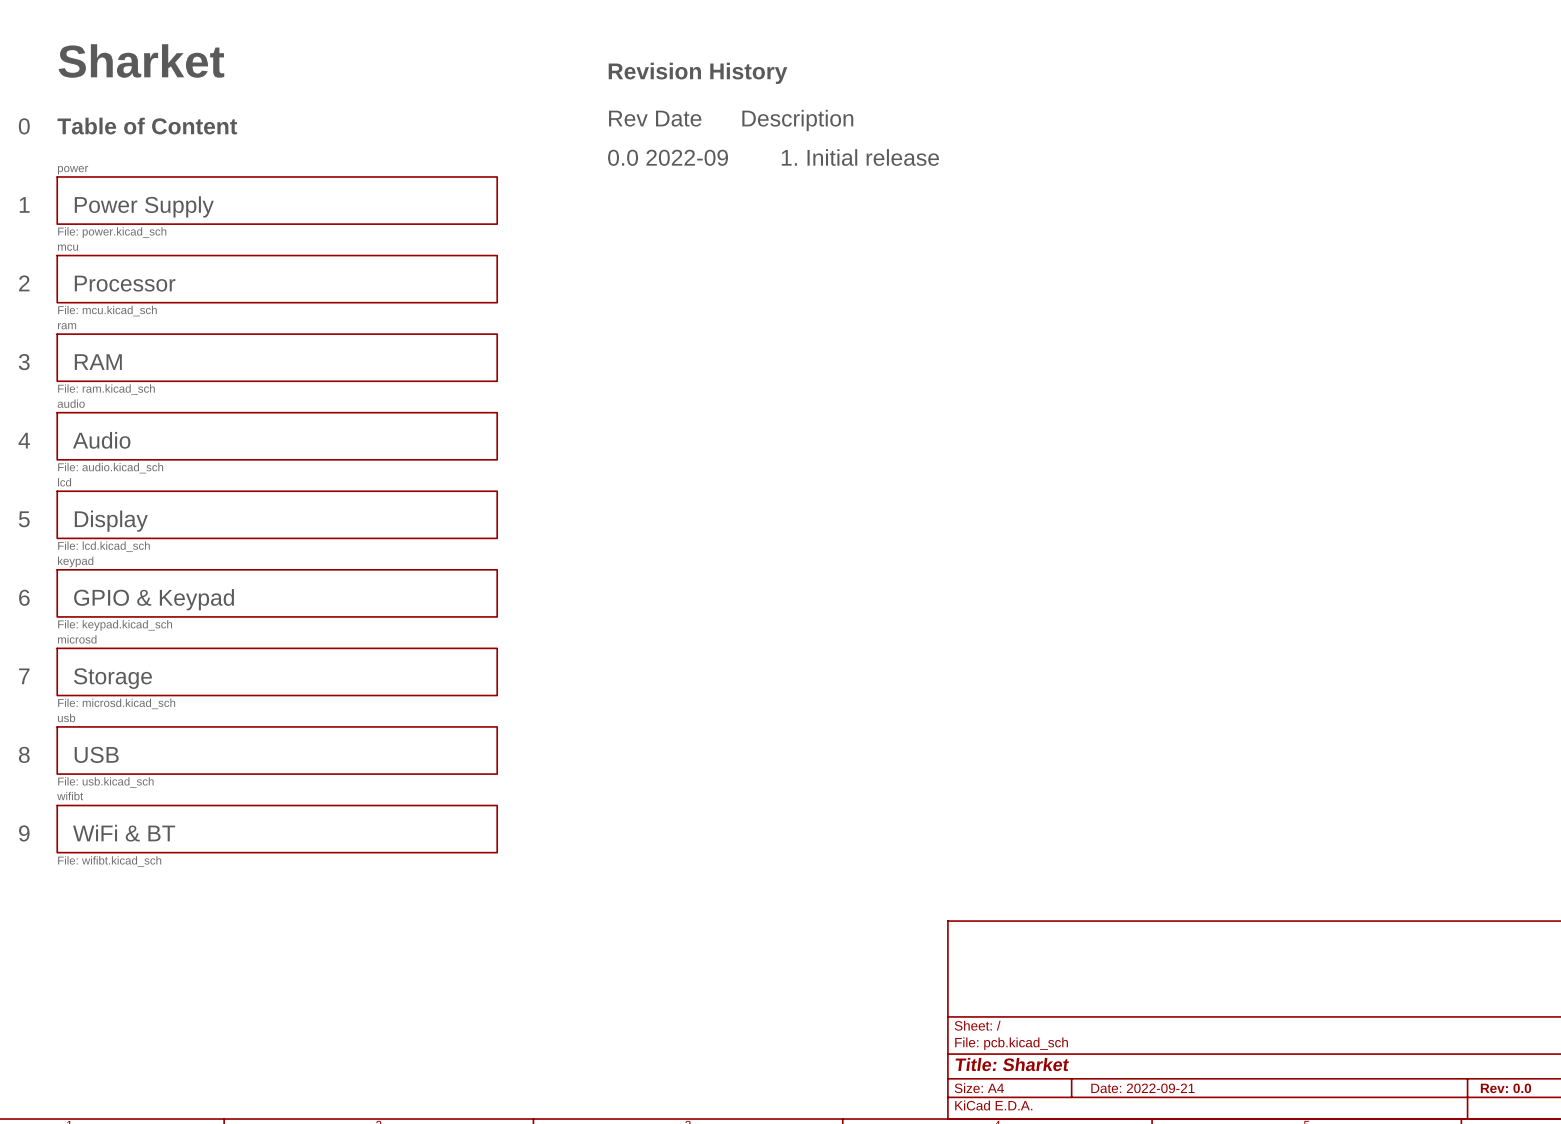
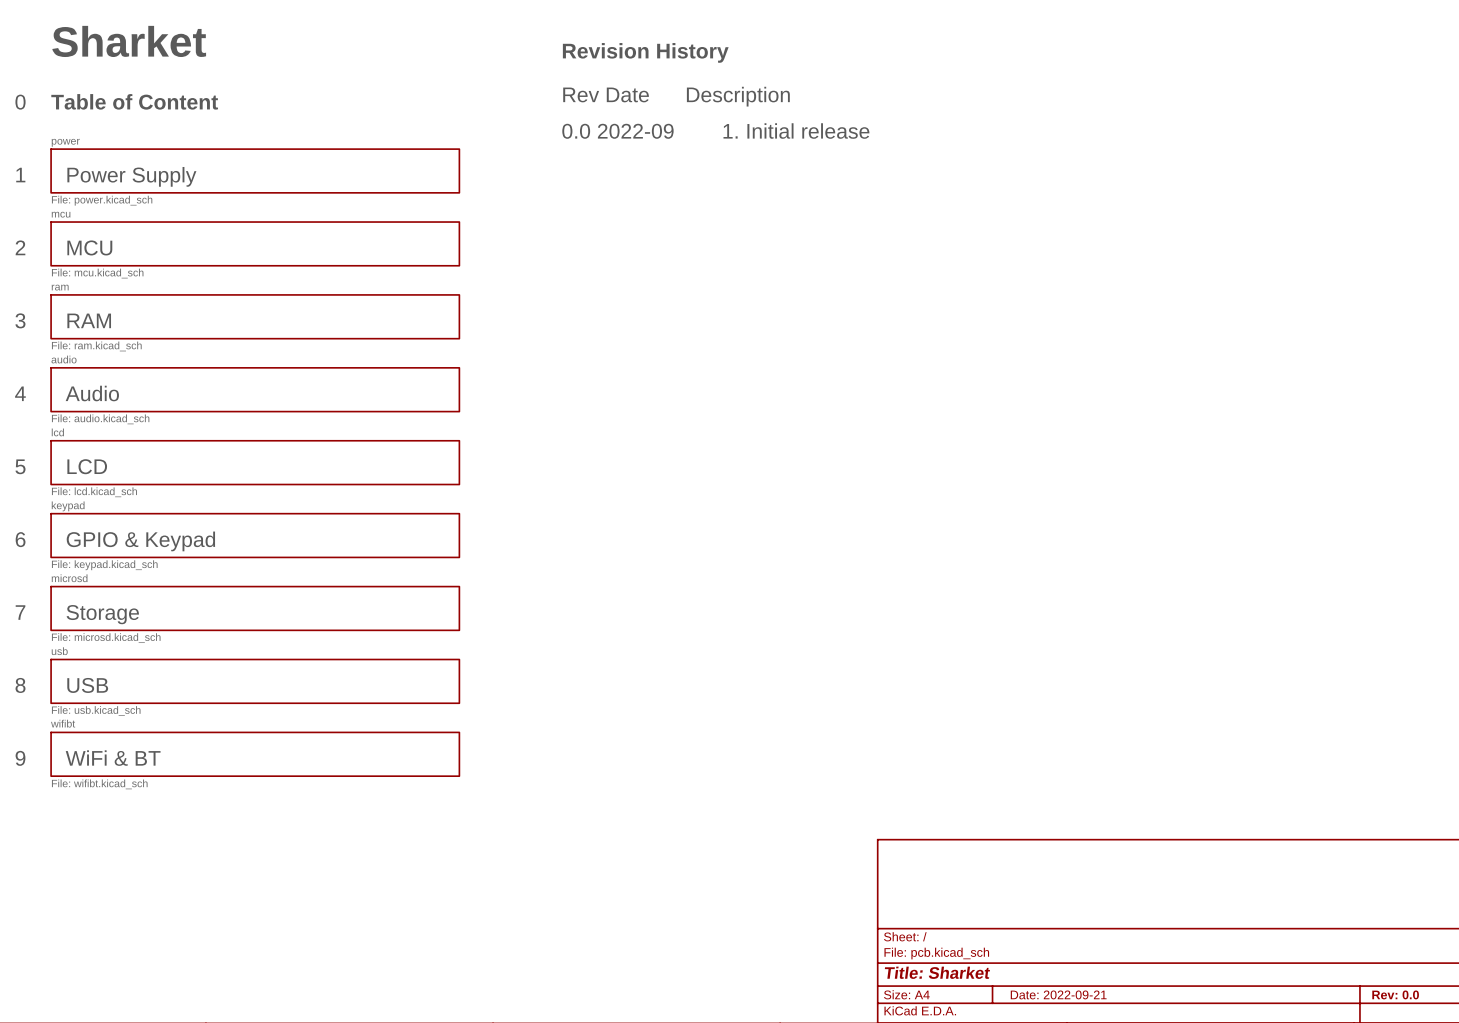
text: Processor (125, 283) -> MCU (89, 247)
text: Display (111, 521) -> LCD (87, 466)

